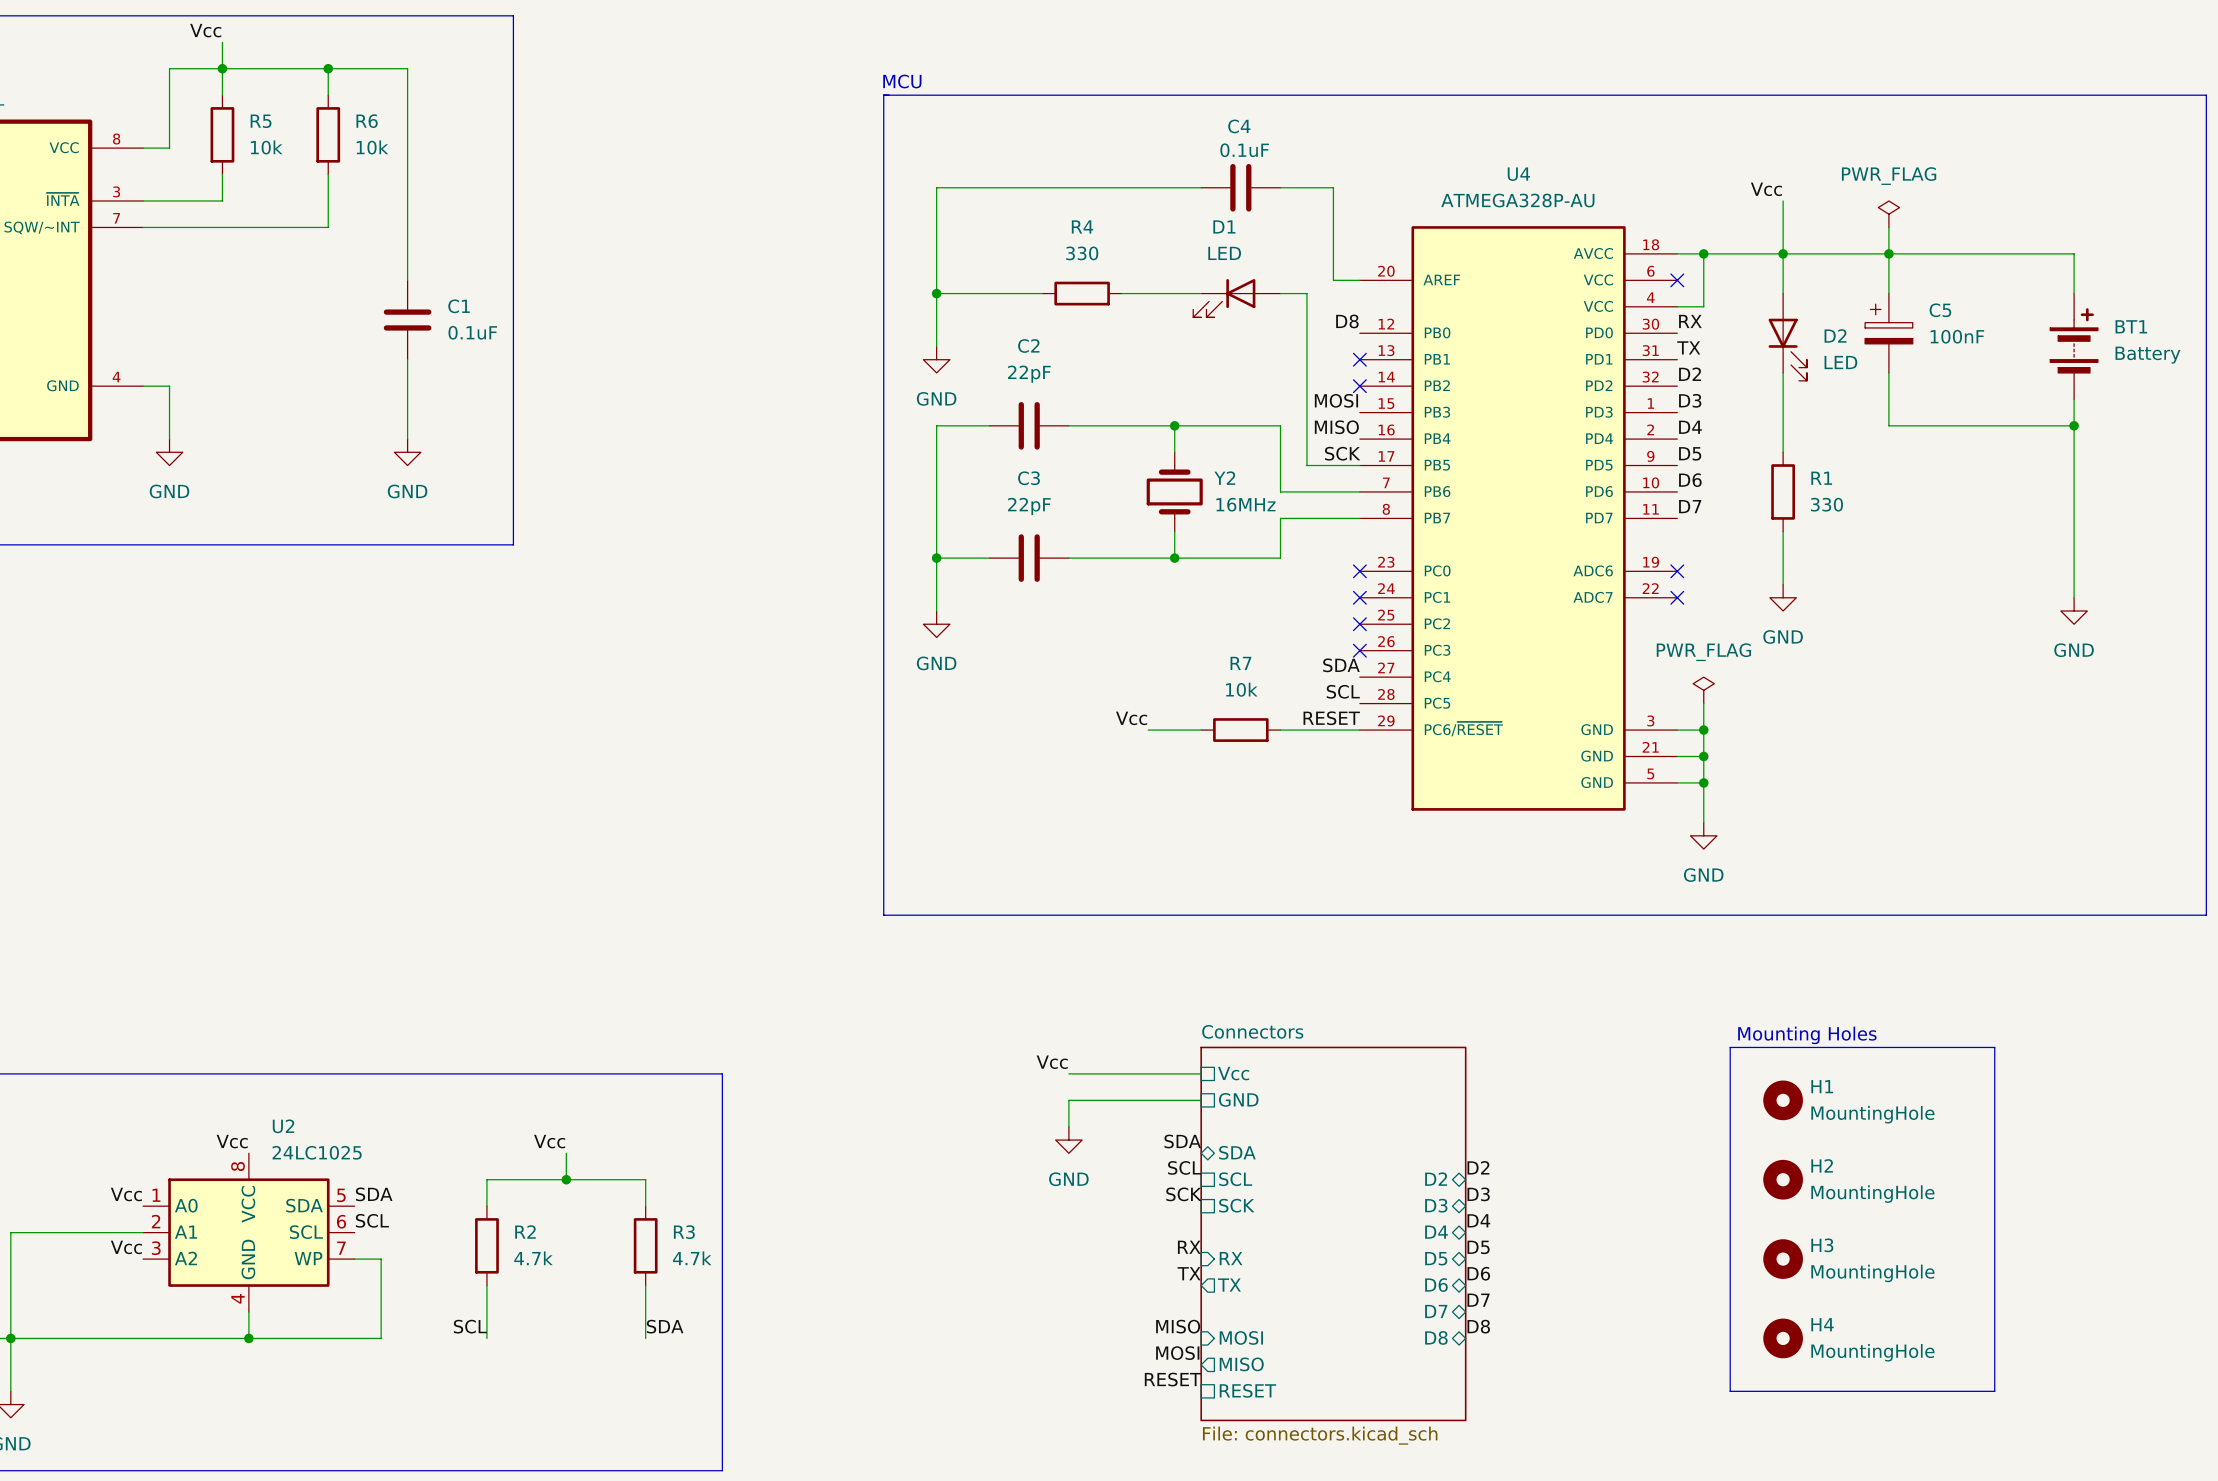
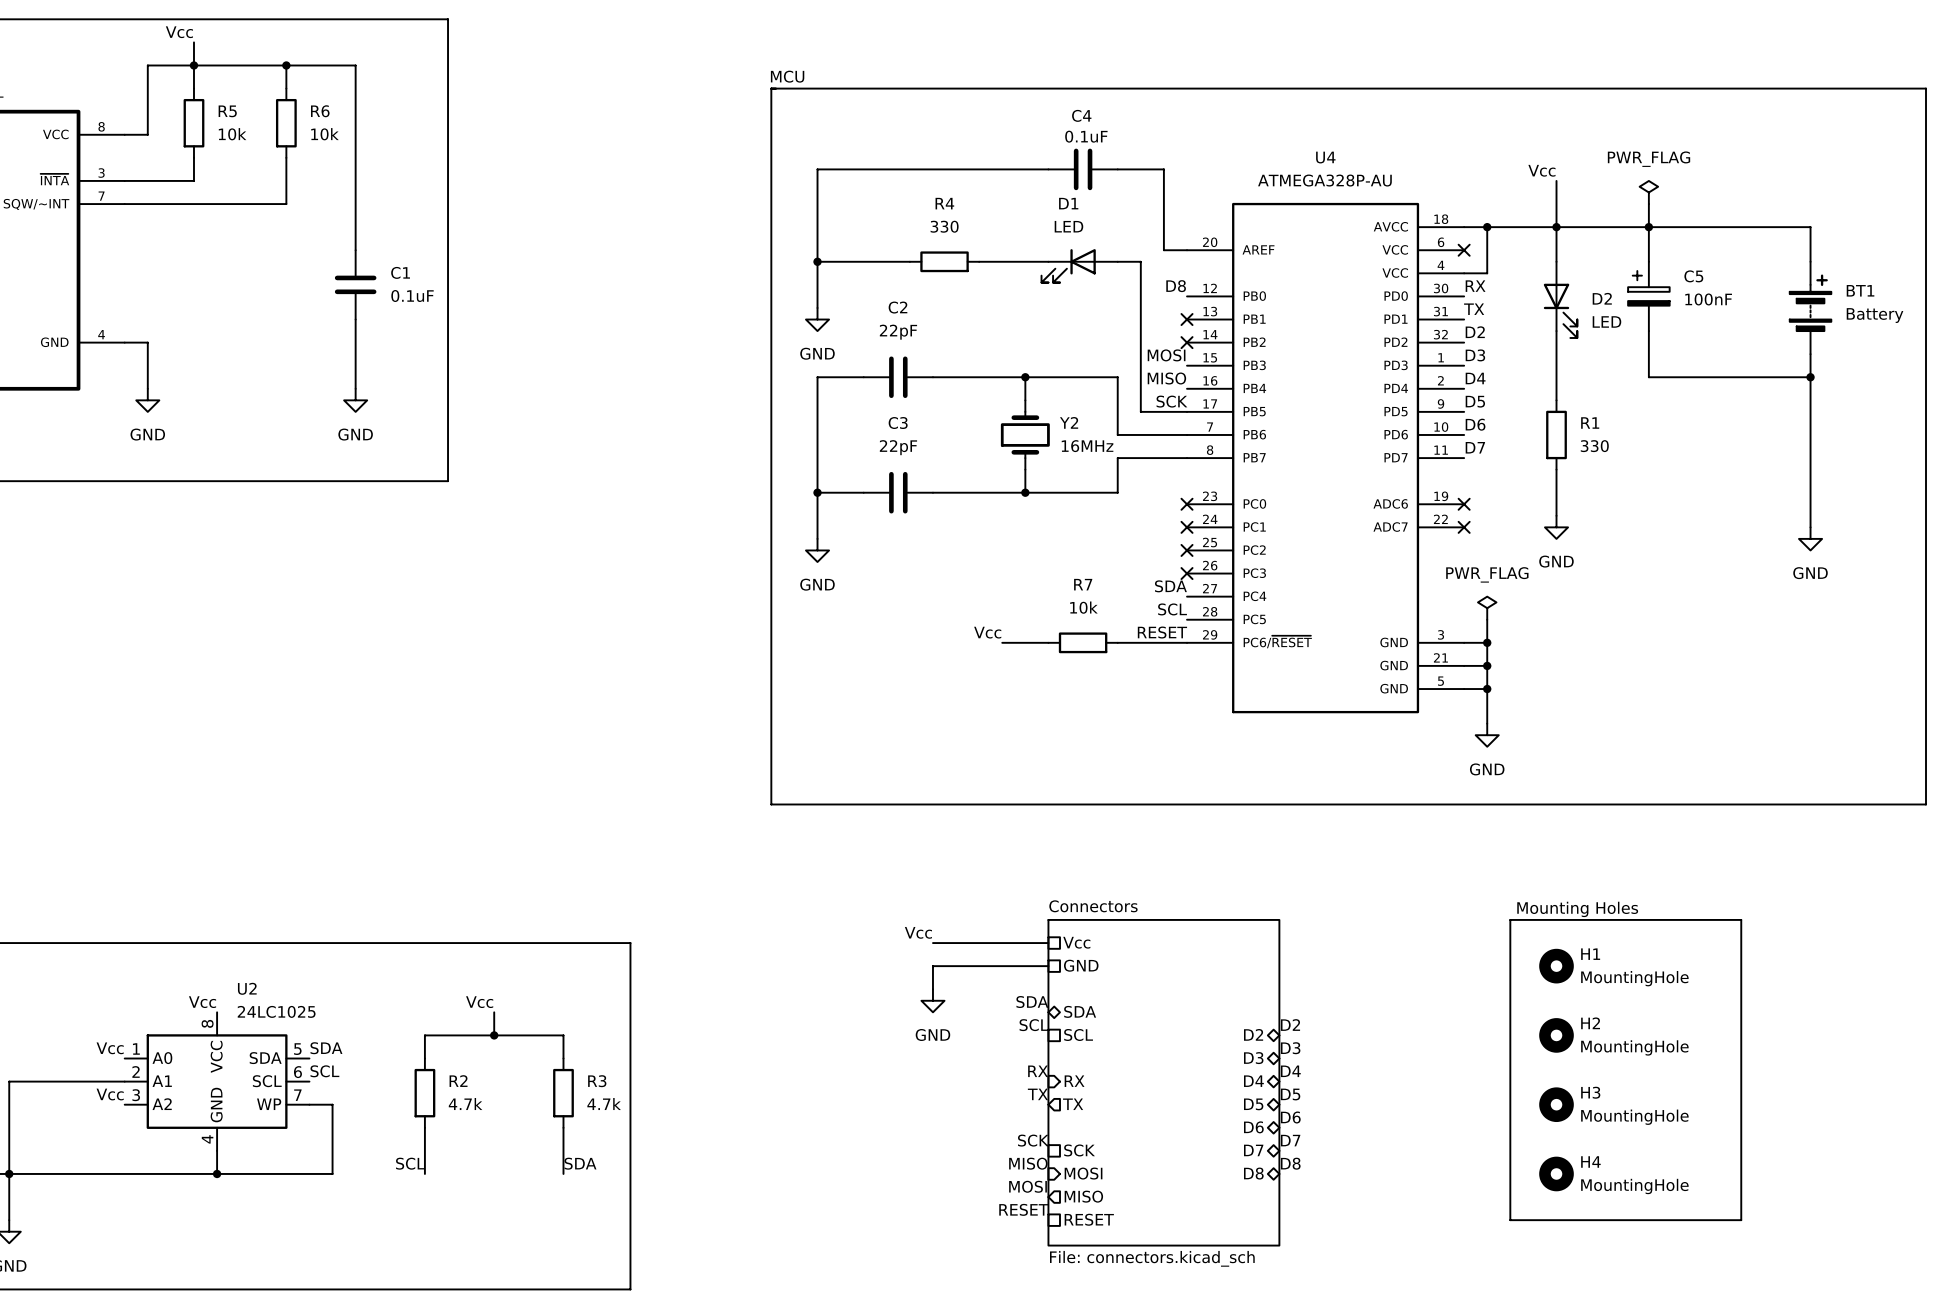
label position: SCK (1183, 1194) -> SCK (1033, 1140)
sheet pin position: SCK (1236, 1205) -> SCK (1079, 1150)
label: none -> RX (1038, 1071)
sheet pin: none -> RX (1074, 1081)
label: RX (1189, 1247) -> TX (1037, 1094)
sheet pin shape: input (1231, 1258) -> output (1073, 1104)
sheet pin: RX (1231, 1258) -> TX (1073, 1104)
label: TX (1189, 1273) -> none
sheet pin: TX (1229, 1285) -> none

